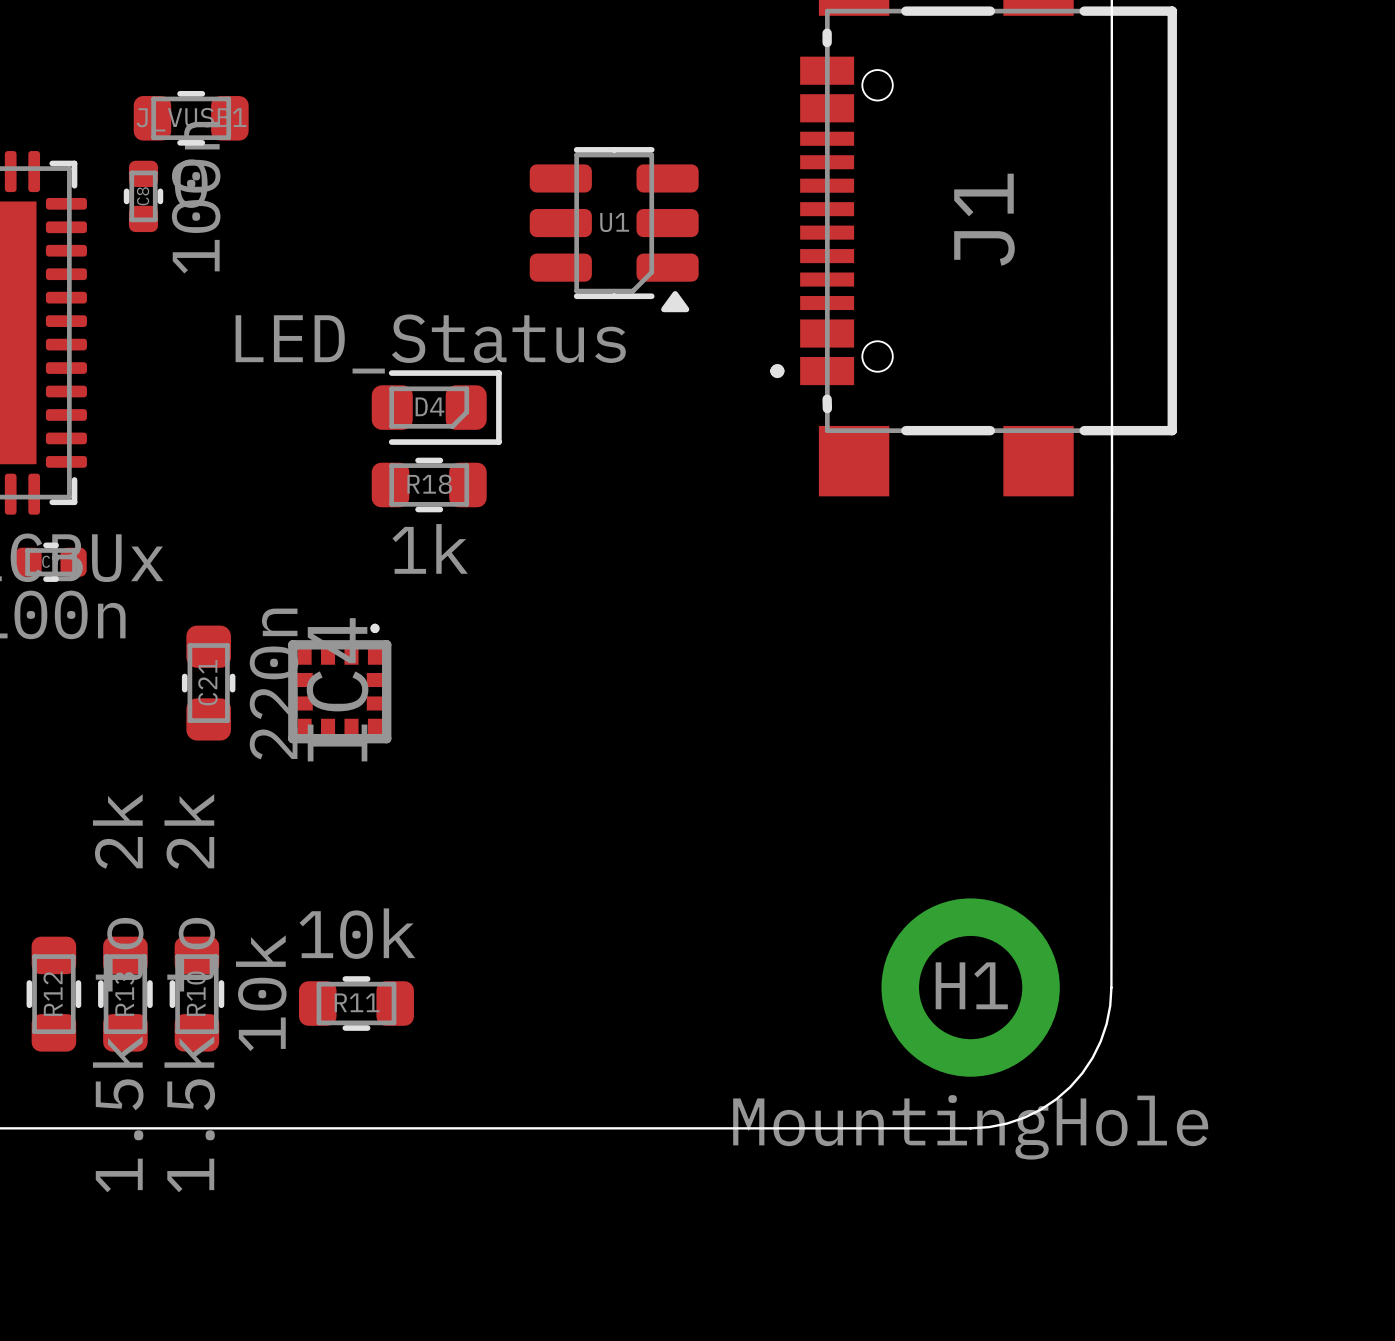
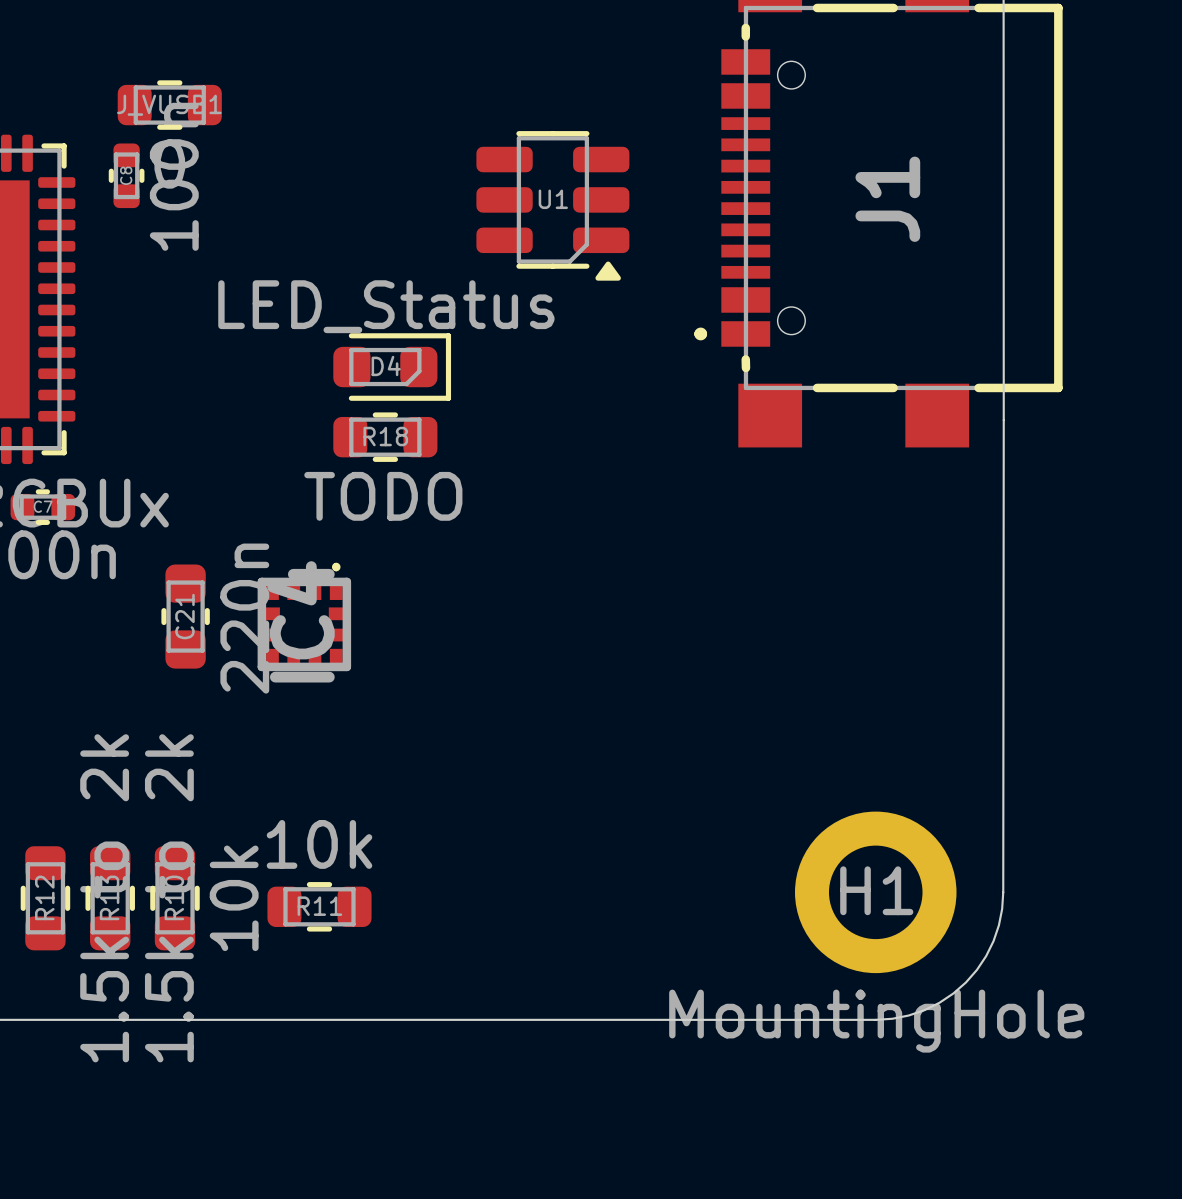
R18 value: 1k (430, 548) -> TODO (383, 496)

